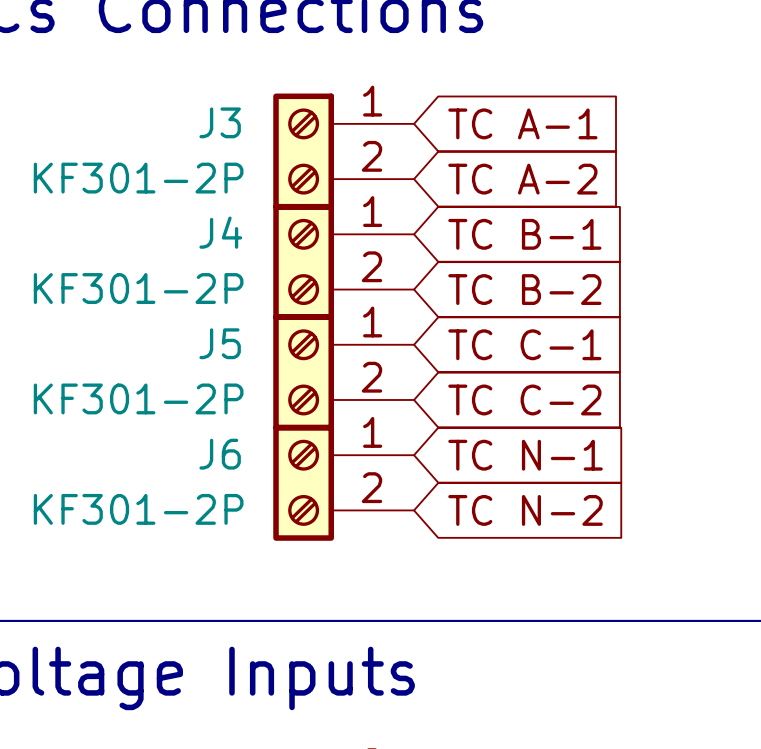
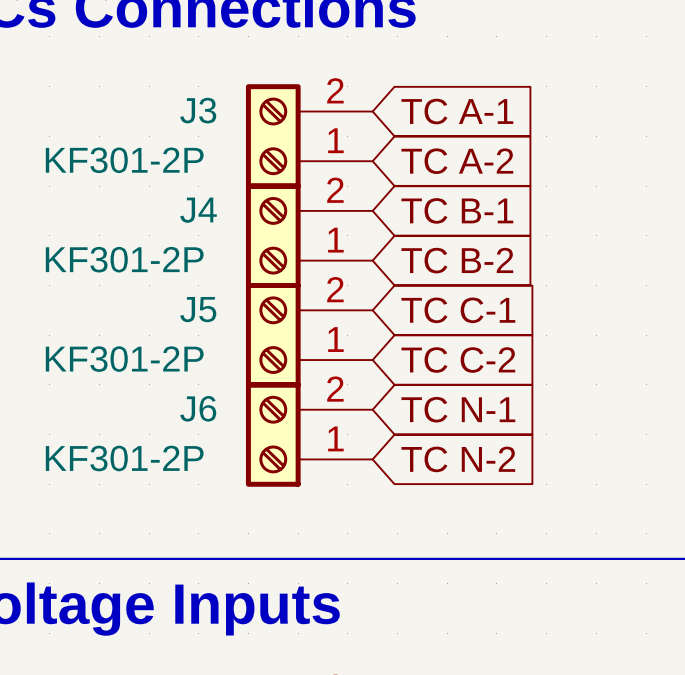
J3 flip: as is (303, 151) -> up-down (273, 136)
J4 flip: as is (303, 261) -> up-down (273, 235)
J5 flip: as is (303, 372) -> up-down (273, 335)
J6 flip: as is (303, 482) -> up-down (273, 434)

